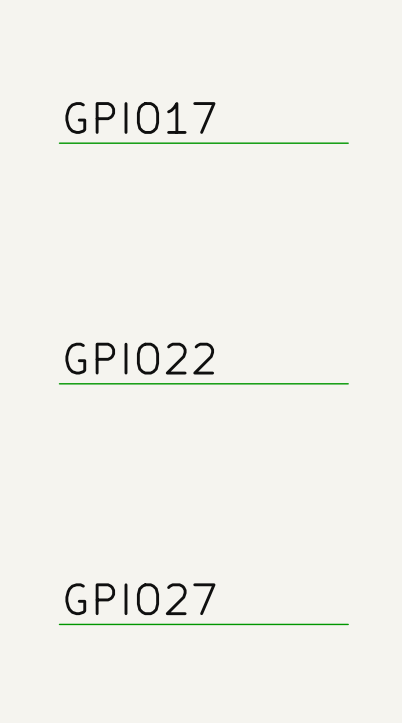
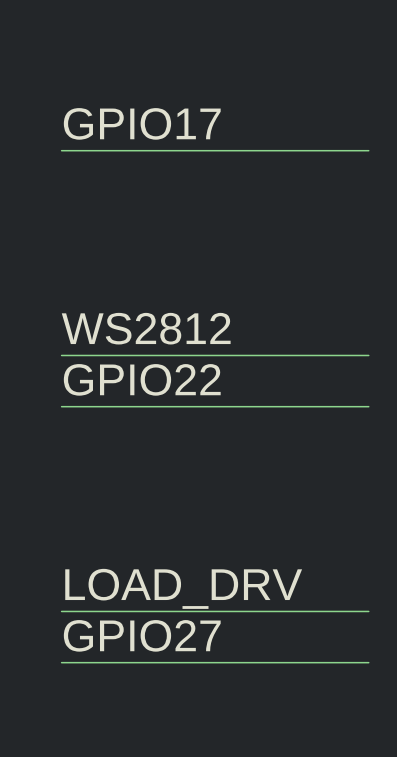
label: none -> WS2812 (146, 328)
wire: none -> (61, 355) (368, 355)
label: none -> LOAD_DRV (183, 588)
wire: none -> (61, 611) (368, 611)

